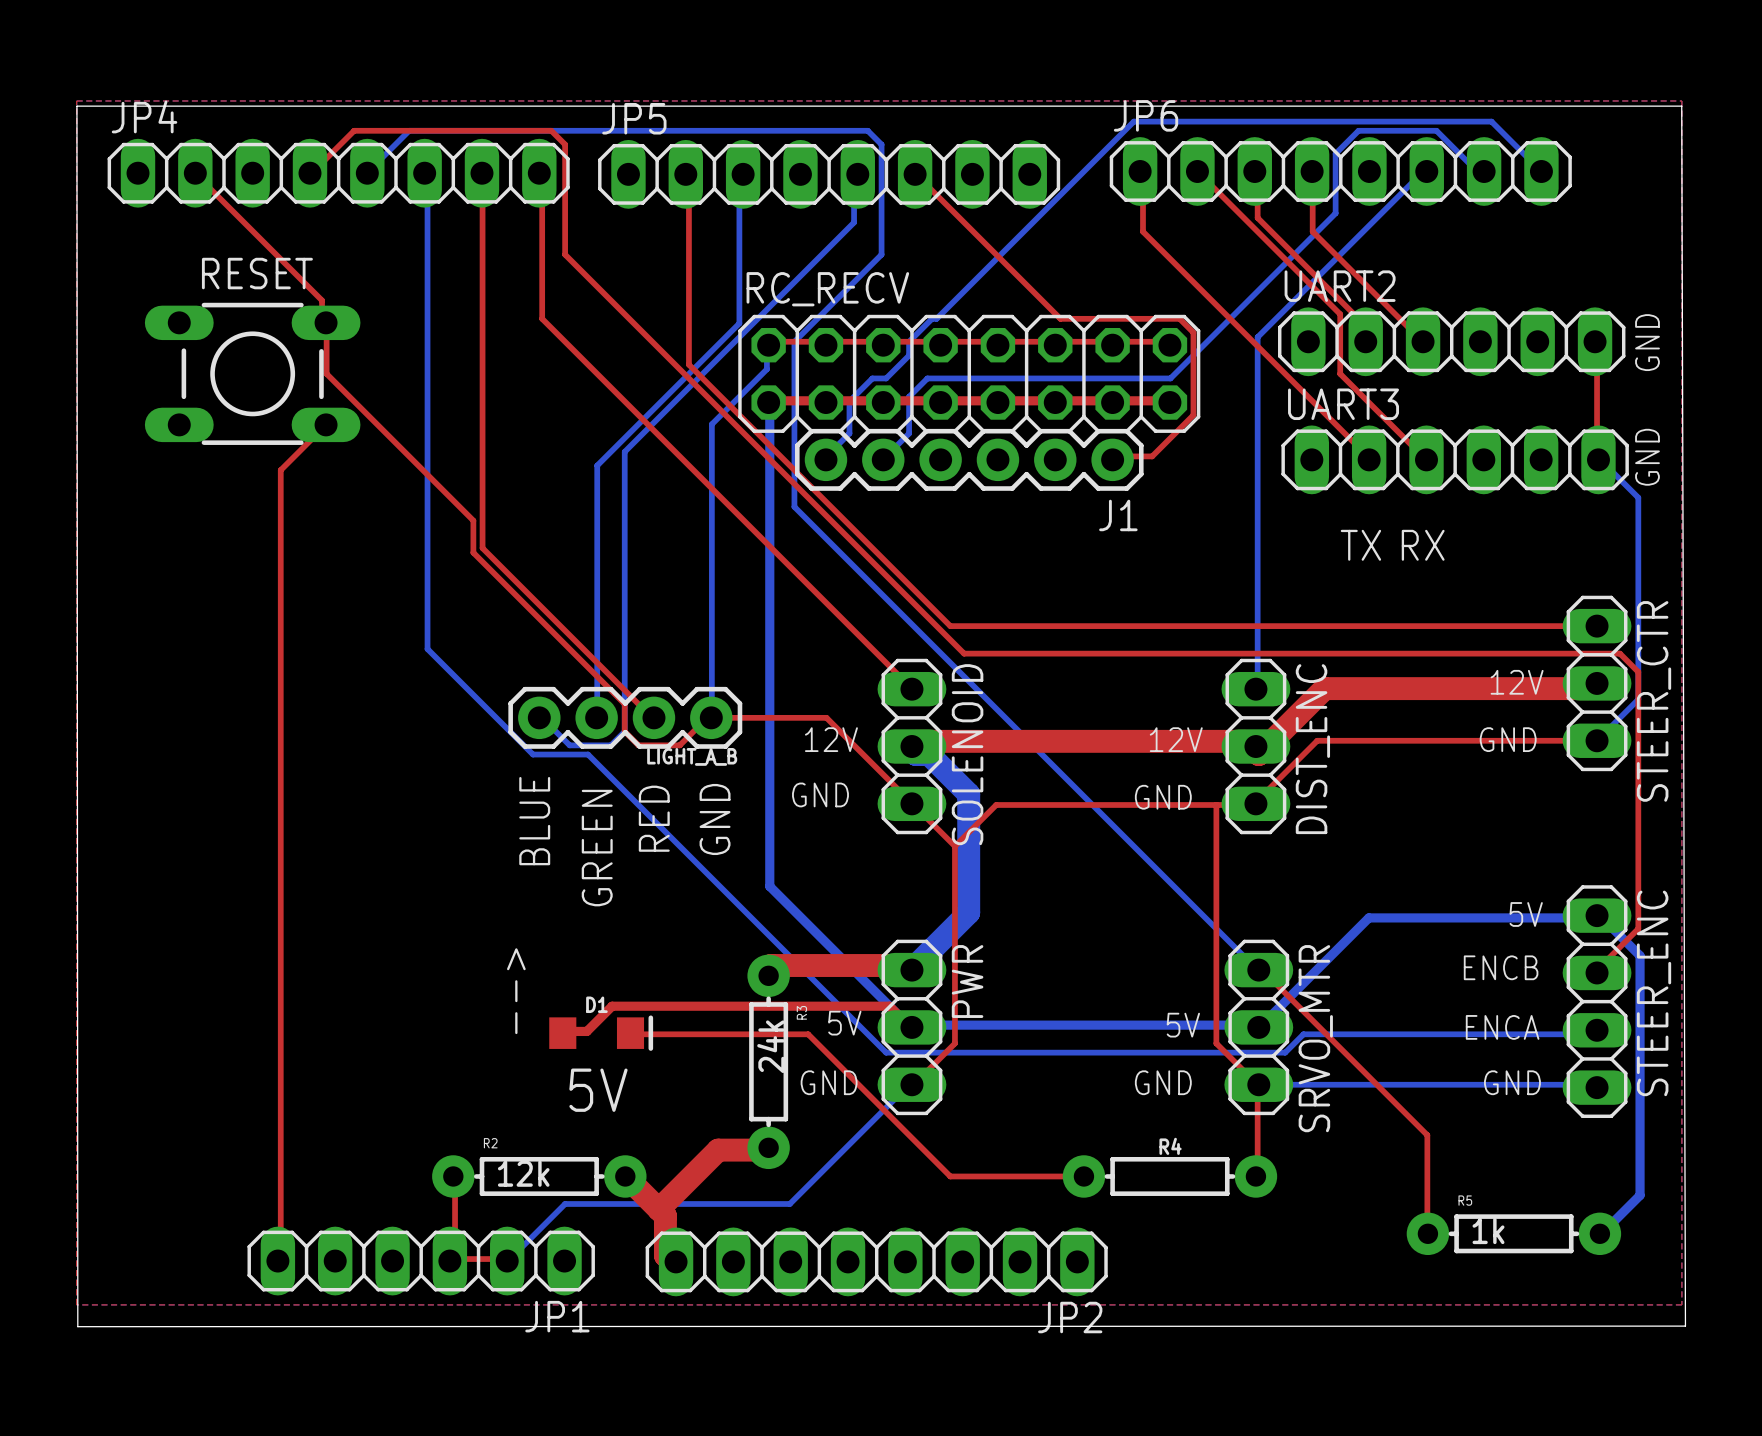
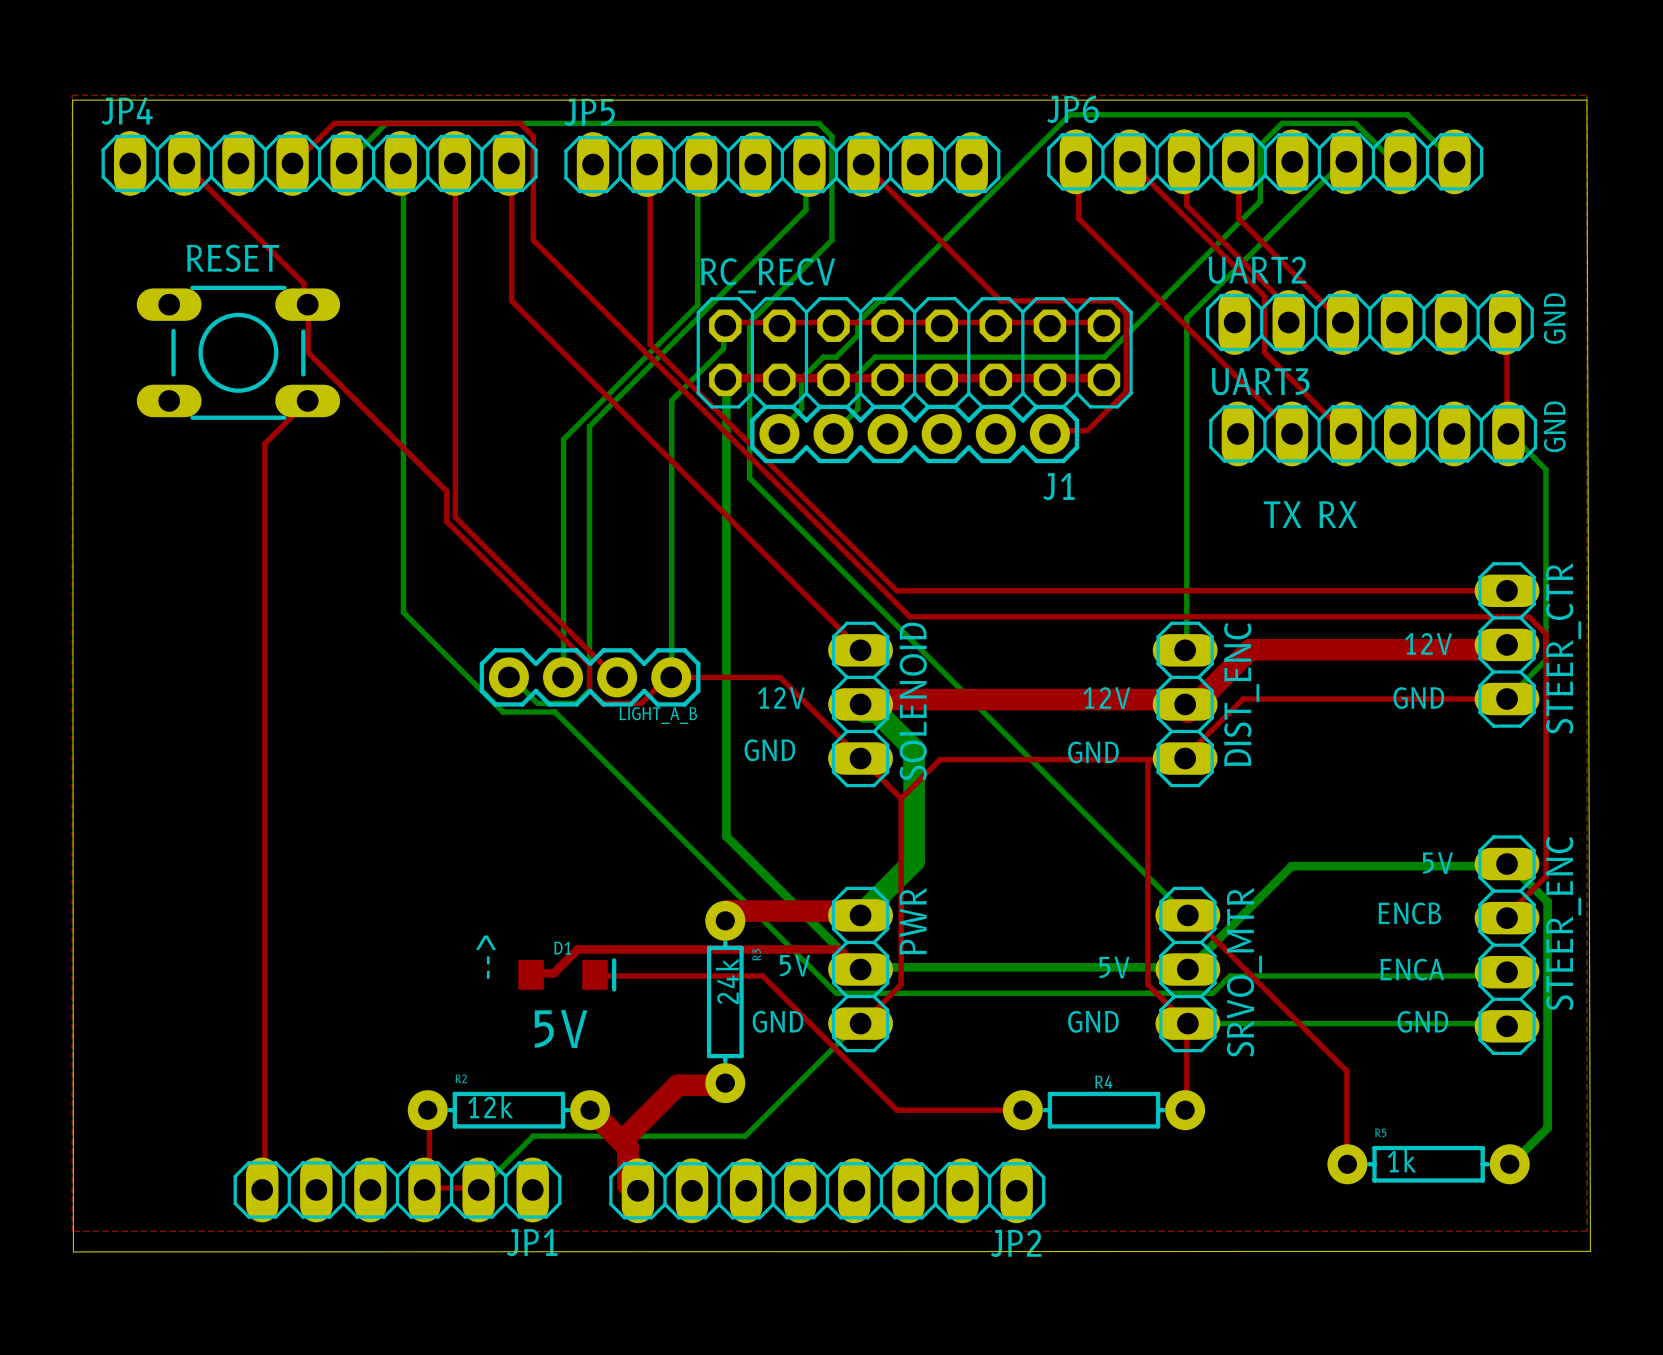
text: RED (654, 818) -> none
text: GND (715, 819) -> none
text: BLUE (534, 821) -> none
text: GREEN (597, 848) -> none

